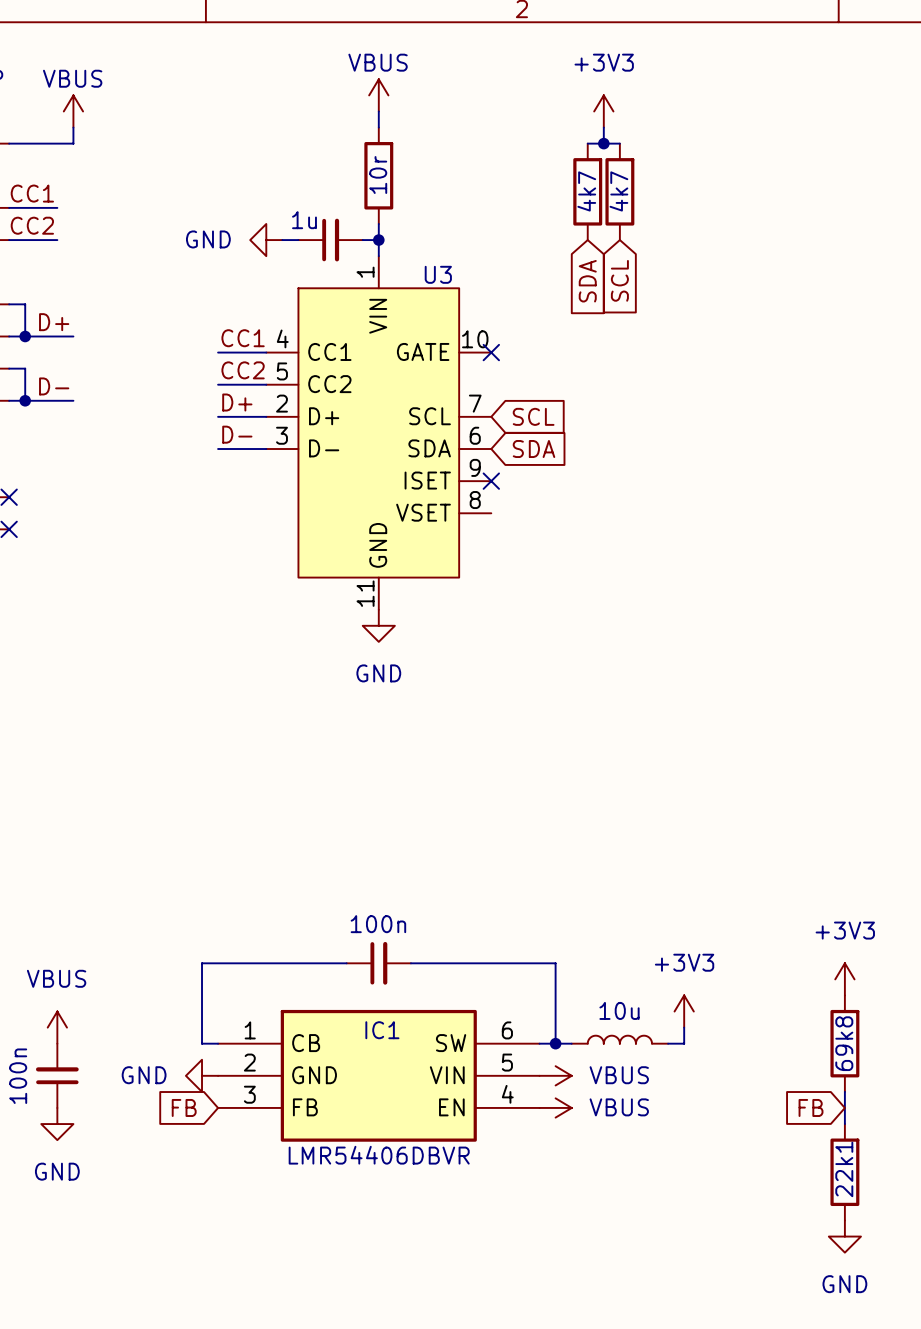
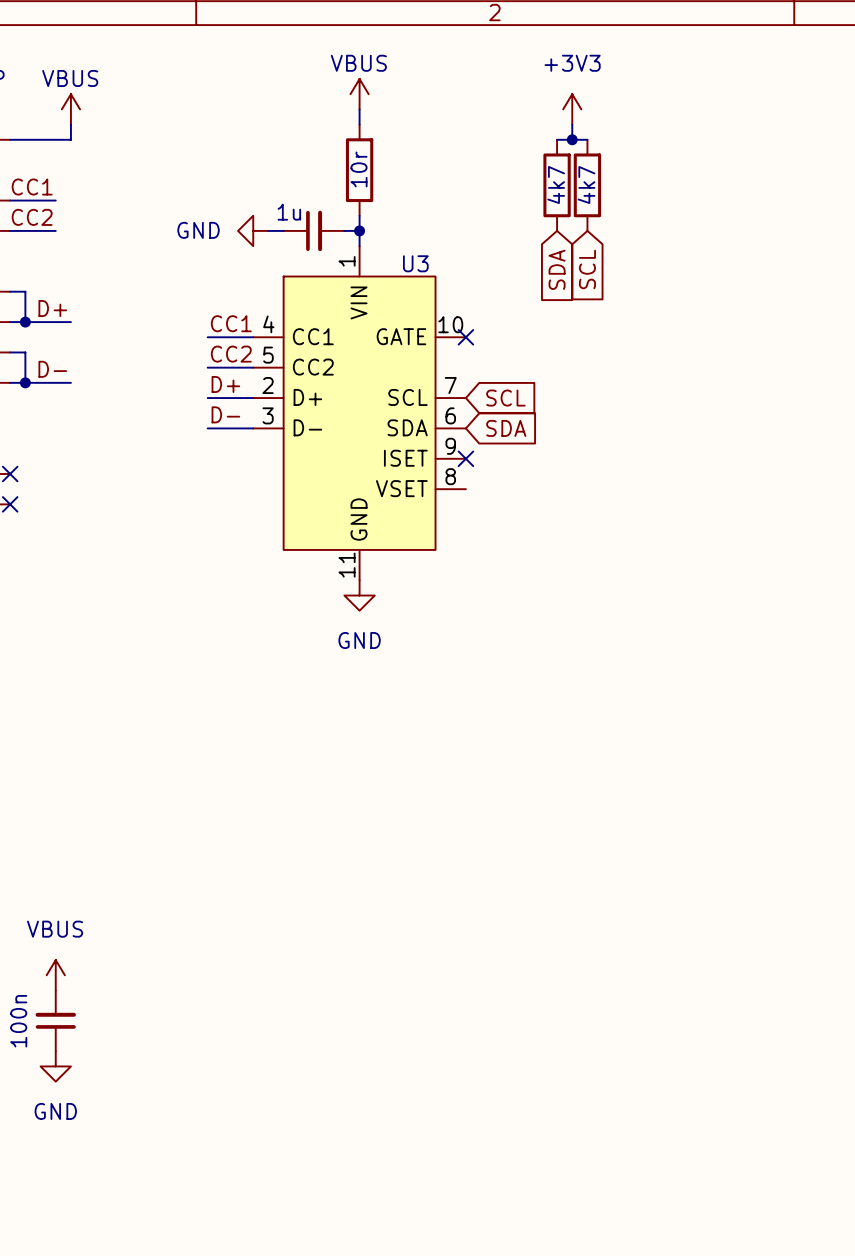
wire: (346, 963) (202, 963) (202, 1043) (218, 1043) -> none
part: 100n (378, 963) -> none
wire: (410, 963) (555, 963) (555, 1043) -> none
power symbol: +3V3 (844, 979) -> none
power symbol: +3V3 (684, 1011) -> none
wire: (684, 1027) (684, 1043) (668, 1043) -> none
part: 10u (619, 1039) -> none
wire: (539, 1043) (571, 1043) -> none
junction: (555, 1043) -> none
part: 69k8 (844, 1043) -> none
power symbol: GND (202, 1075) -> none
IC1: LMR54406DBVR (378, 1075) -> none
power symbol: VBUS (555, 1075) -> none
wire: (844, 1091) (844, 1124) -> none
global label: FB (184, 1107) -> none
power symbol: VBUS (555, 1107) -> none
global label: FB (811, 1107) -> none
part: 22k1 (844, 1172) -> none
power symbol: GND (844, 1236) -> none

